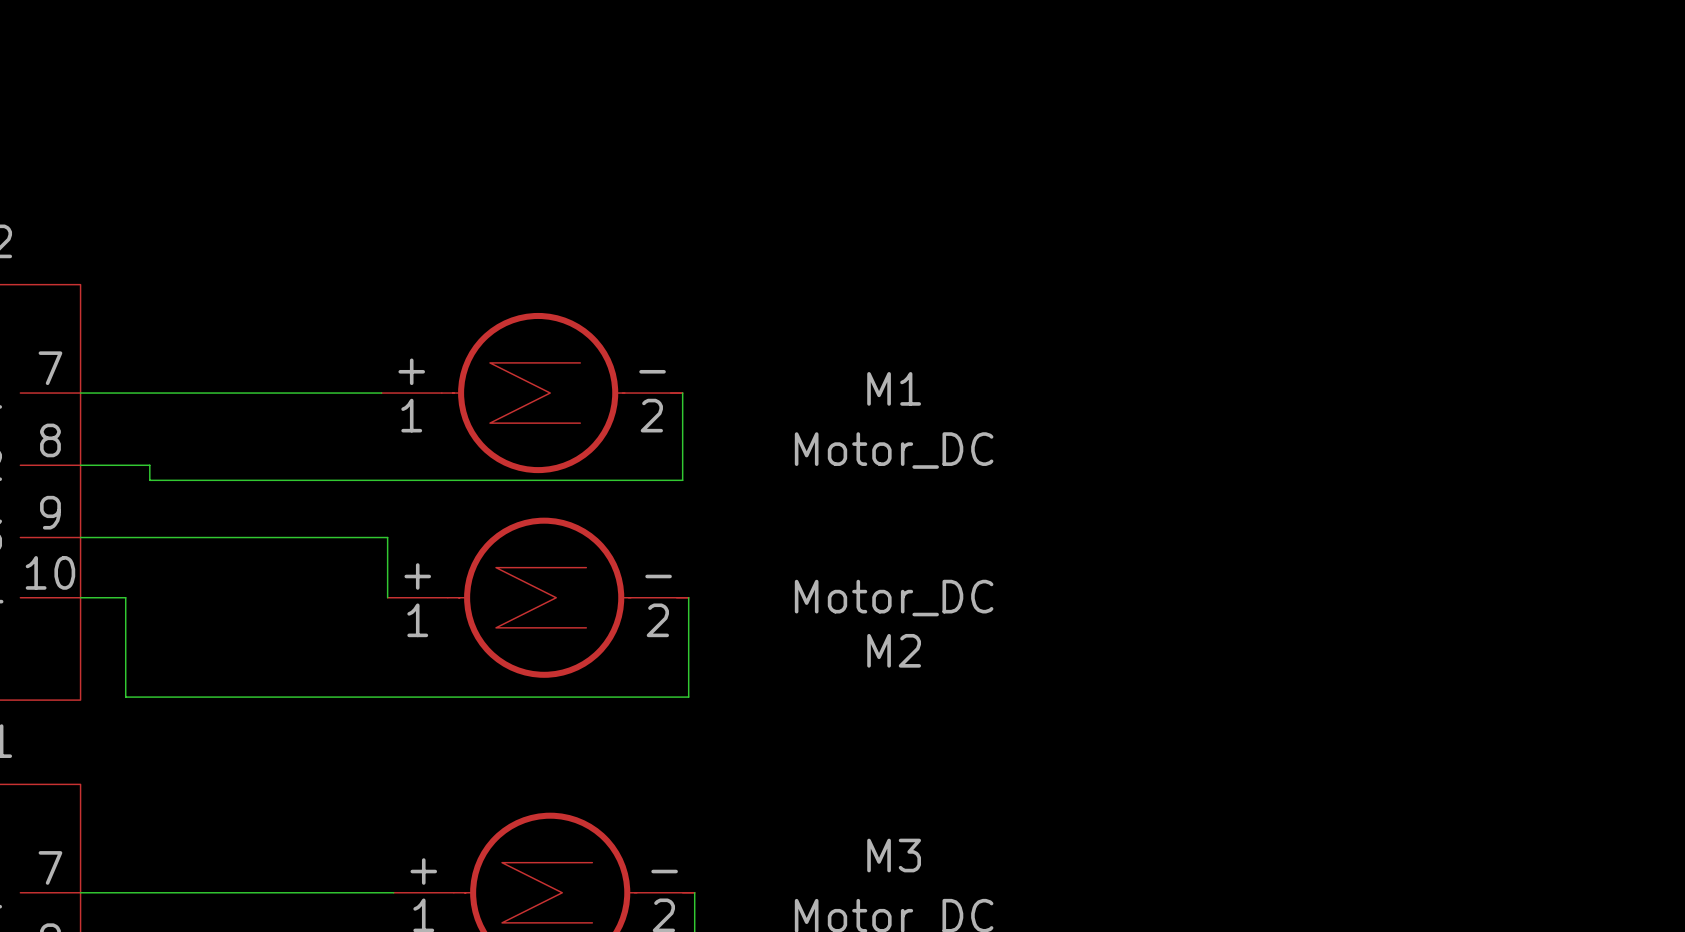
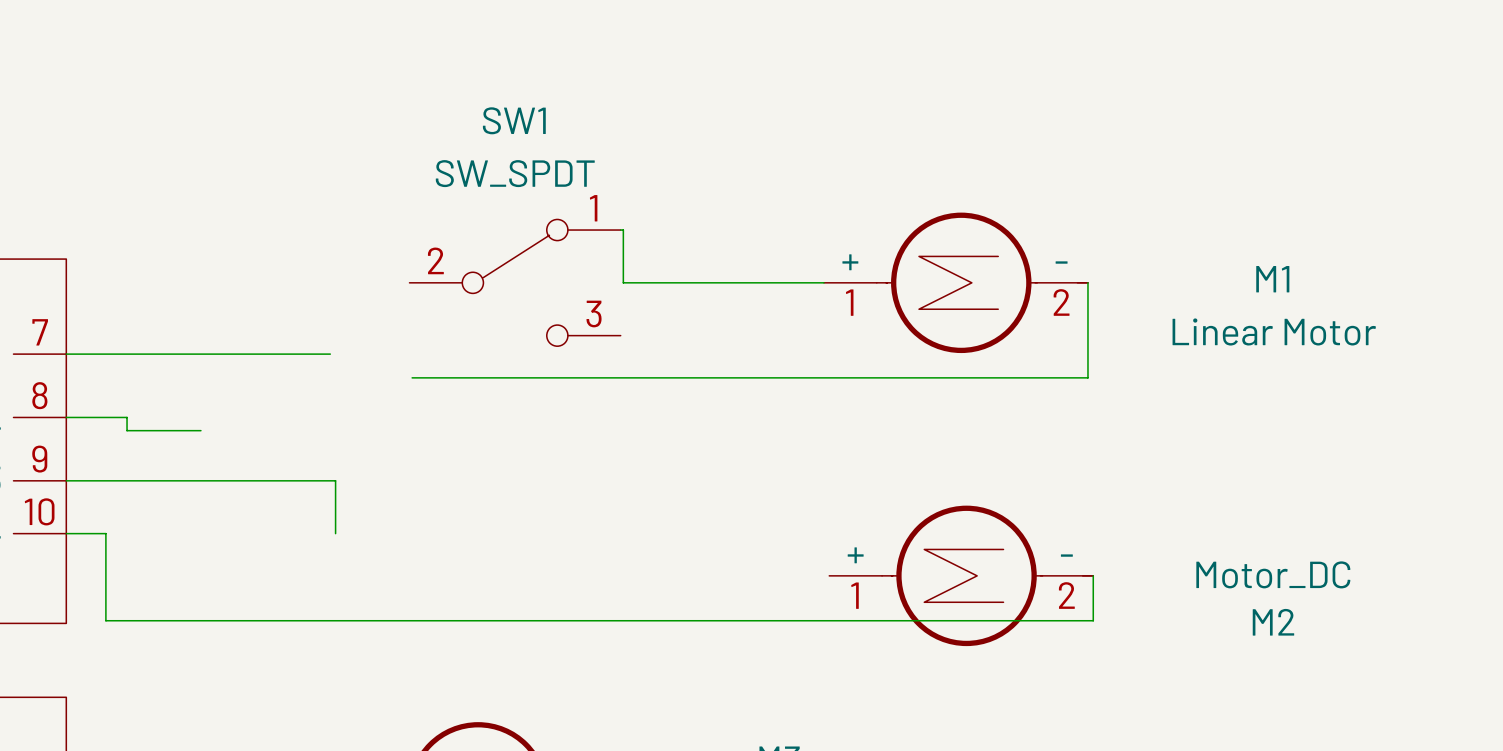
wire: none -> (620, 230) (623, 230) (623, 282) (823, 282)
SW1: none -> SW_SPDT (515, 282)
wire: none -> (1087, 282) (1087, 377) (412, 377)
M1 position: (532, 393) -> (955, 282)
wire: (682, 393) (682, 480) (234, 480) -> none
M1 value: Motor_DC (894, 450) -> Linear Motor (1274, 331)
M2 position: (538, 597) -> (961, 575)
wire: (688, 597) (688, 697) -> (1093, 575) (1093, 620) (599, 620)

